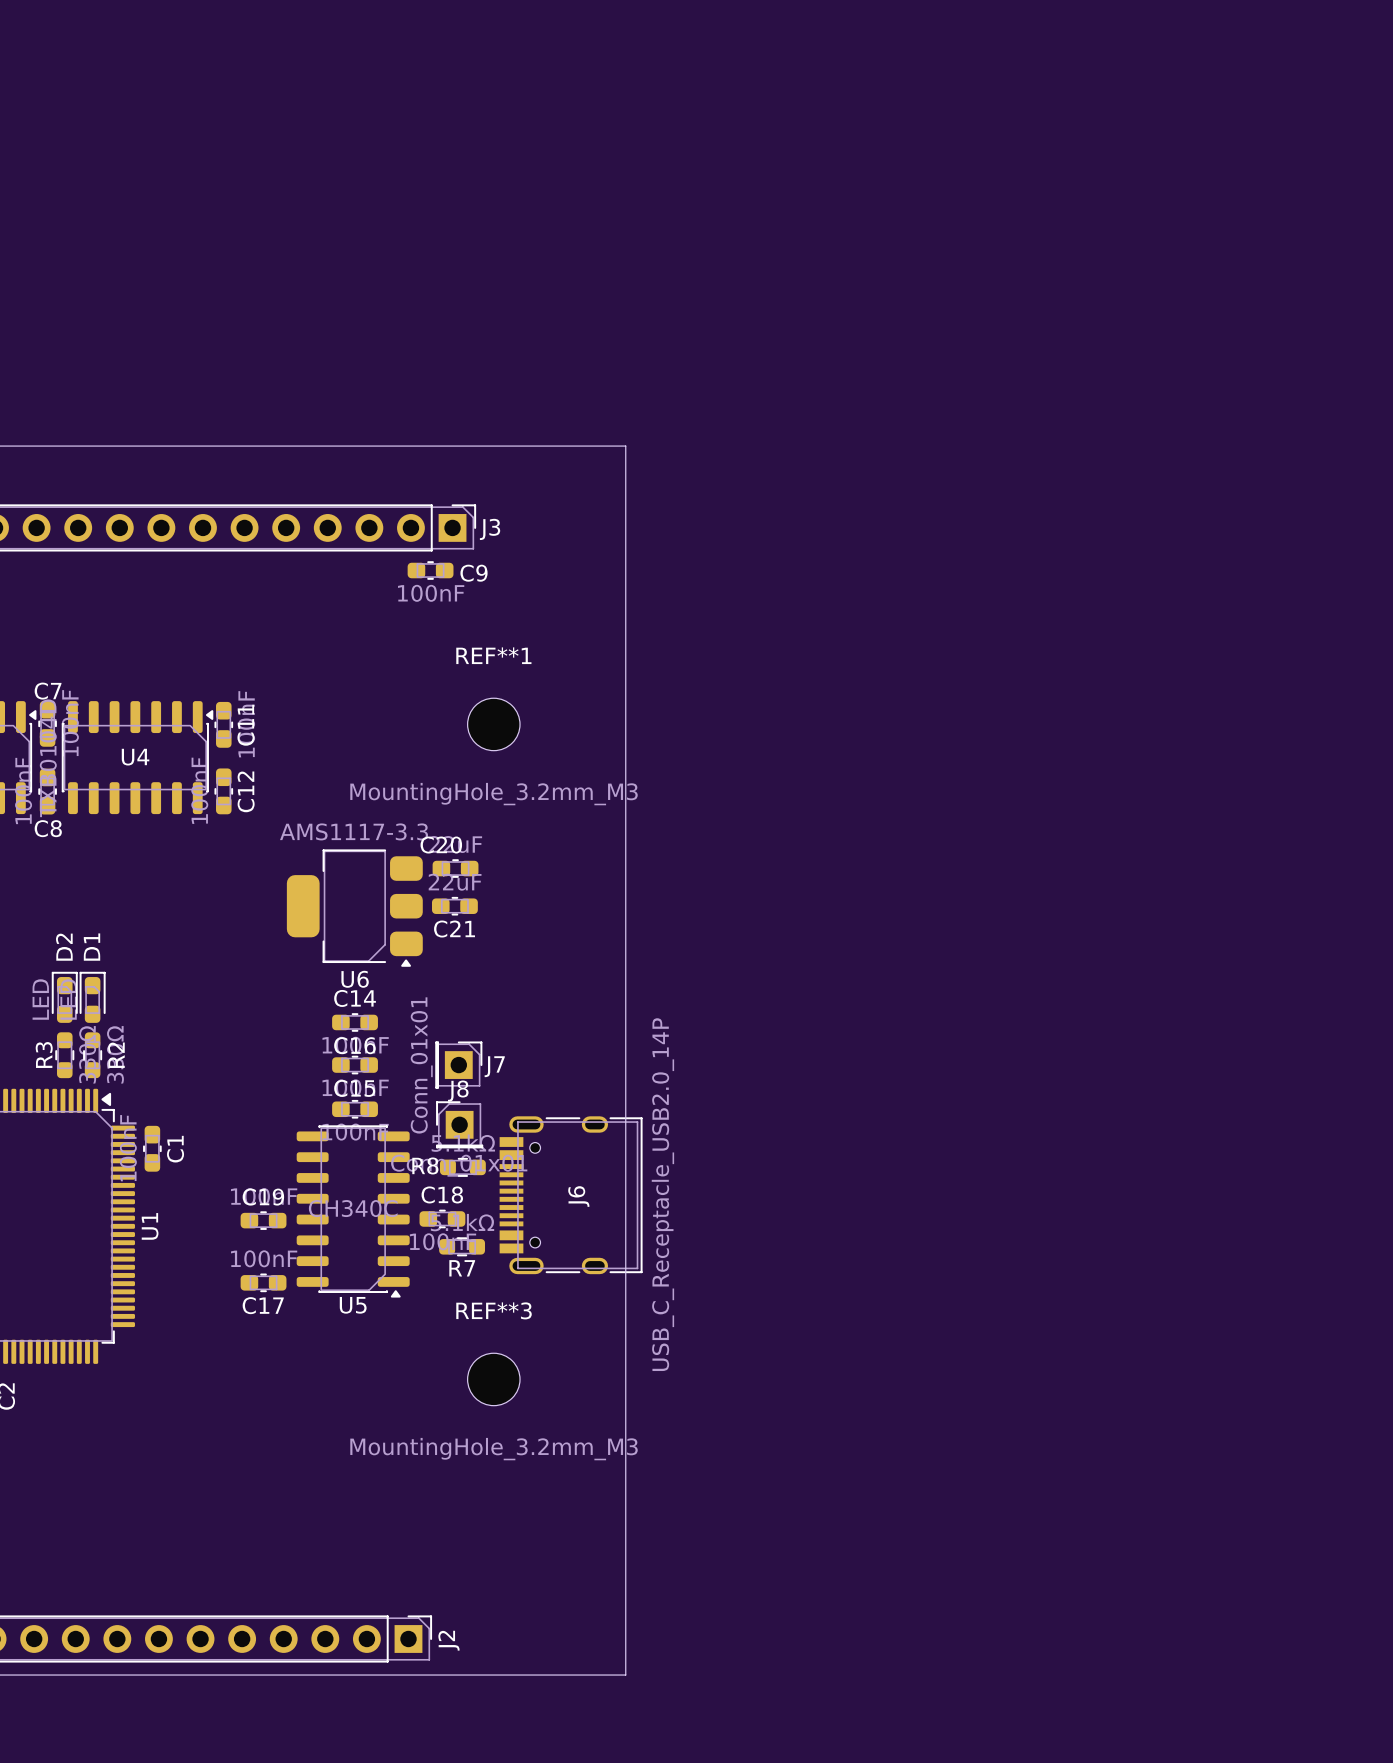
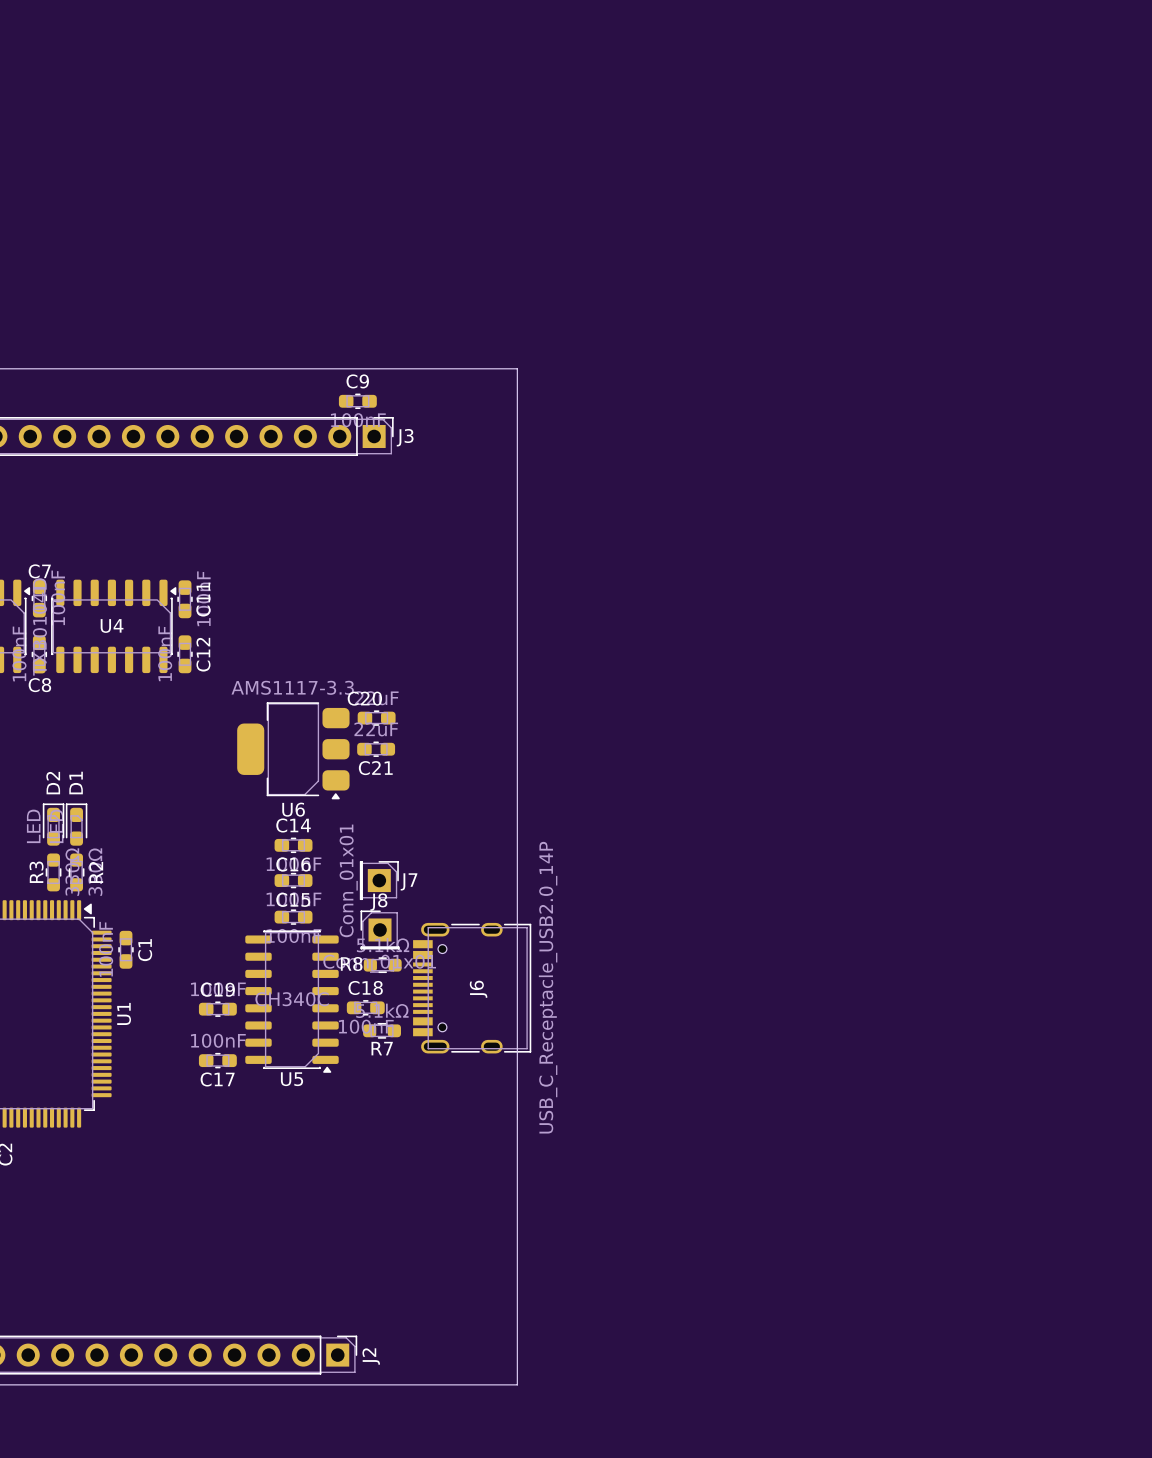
C9 position: (430, 570) -> (357, 401)
C9 name position: C9 (474, 573) -> C9 (357, 381)
REF**1: MountingHole_3.2mm_M3 (493, 724) -> none
REF**3: MountingHole_3.2mm_M3 (493, 1379) -> none

